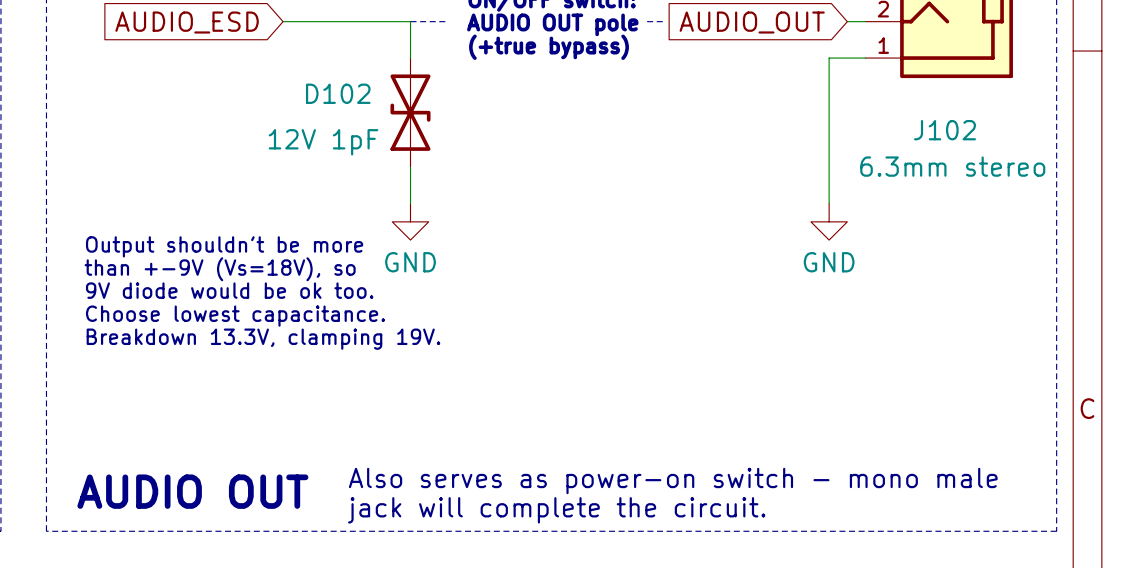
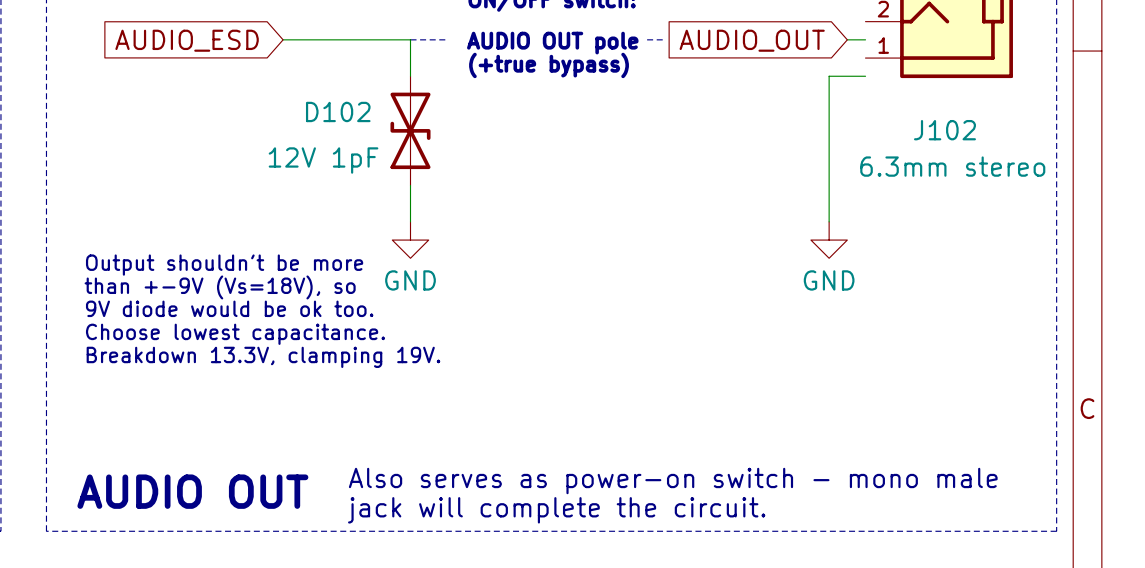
wire: (283, 21) (410, 21) (410, 39) -> (283, 39) (410, 39)
line: (410, 21) (446, 21) -> (410, 39) (446, 39)
line: (647, 21) (665, 21) -> (647, 39) (665, 39)
wire: (847, 21) (865, 21) -> (847, 39) (865, 39)
global label position: AUDIO_ESD (187, 22) -> AUDIO_ESD (187, 40)
global label position: AUDIO_OUT (752, 22) -> AUDIO_OUT (752, 40)
text position: AUDIO OUT pole (552, 24) -> AUDIO OUT pole (552, 43)
text position: (+true bypass) (549, 47) -> (+true bypass) (549, 65)
wire: (865, 58) (829, 58) (829, 76) -> (865, 76) (829, 76)
D102 position: (410, 112) -> (410, 130)
power symbol position: GND (410, 221) -> GND (410, 240)
power symbol position: GND (829, 221) -> GND (829, 240)
text position: Output shouldn't be more (224, 246) -> Output shouldn't be more (224, 265)
text position: than +-9V (Vs=18V), so (220, 269) -> than +-9V (Vs=18V), so (220, 287)
text position: 9V diode would be ok too. (229, 290) -> 9V diode would be ok too. (229, 308)
text position: Choose lowest capacitance. (235, 316) -> Choose lowest capacitance. (235, 334)
text position: Breakdown 13.3V, clamping 19V. (263, 339) -> Breakdown 13.3V, clamping 19V. (263, 357)

